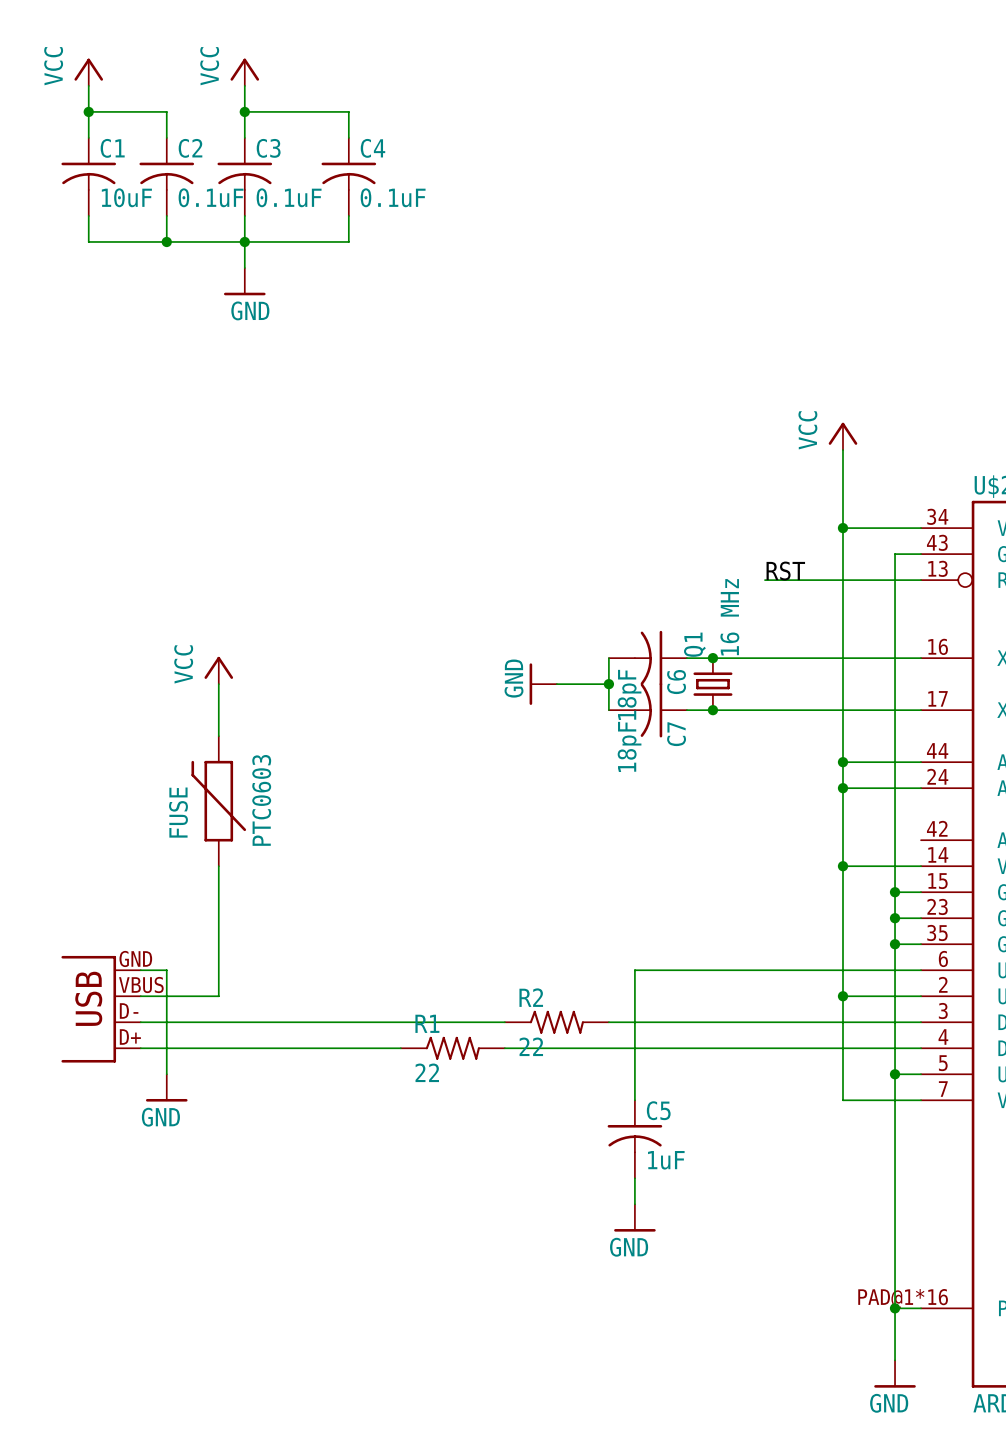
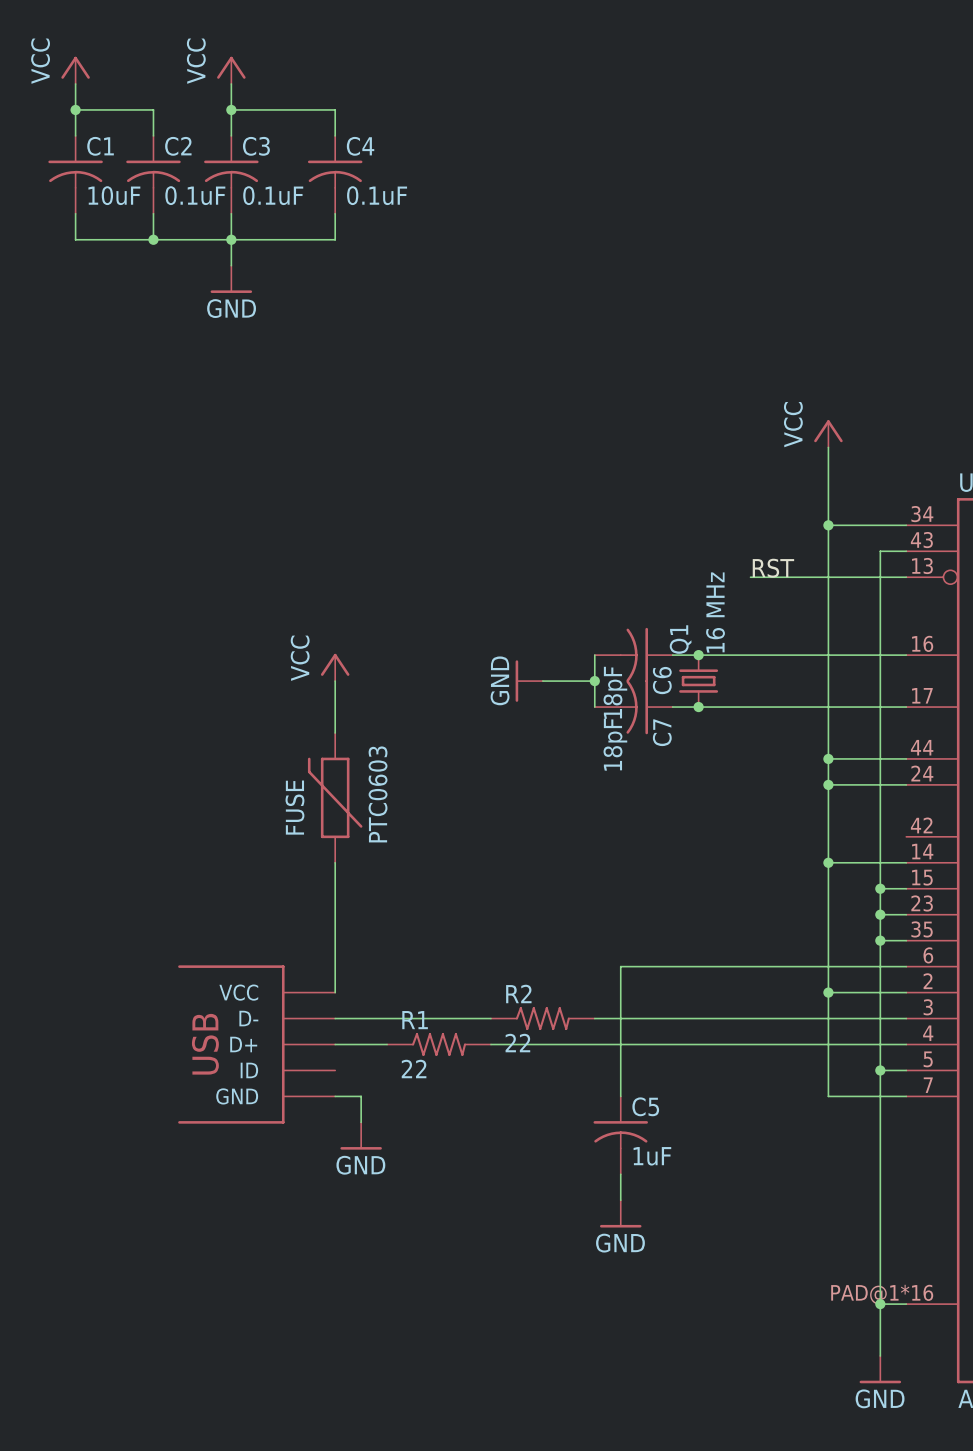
power symbol position: VCC (218, 670) -> VCC (335, 667)
wire: (218, 684) (218, 736) -> (335, 681) (335, 732)
FUSE position: (218, 801) -> (335, 797)
wire: (218, 866) (218, 996) (140, 996) -> none
wire: none -> (335, 862) (335, 992)
wire: (140, 970) (166, 970) (166, 1074) -> none
part: (101, 1009) -> none
wire: (140, 1022) (348, 1022) -> none
wire: (140, 1048) (348, 1048) -> none
part: none -> (256, 1044)
power symbol position: GND (166, 1087) -> GND (361, 1136)
wire: none -> (335, 1096) (361, 1096) (361, 1122)

